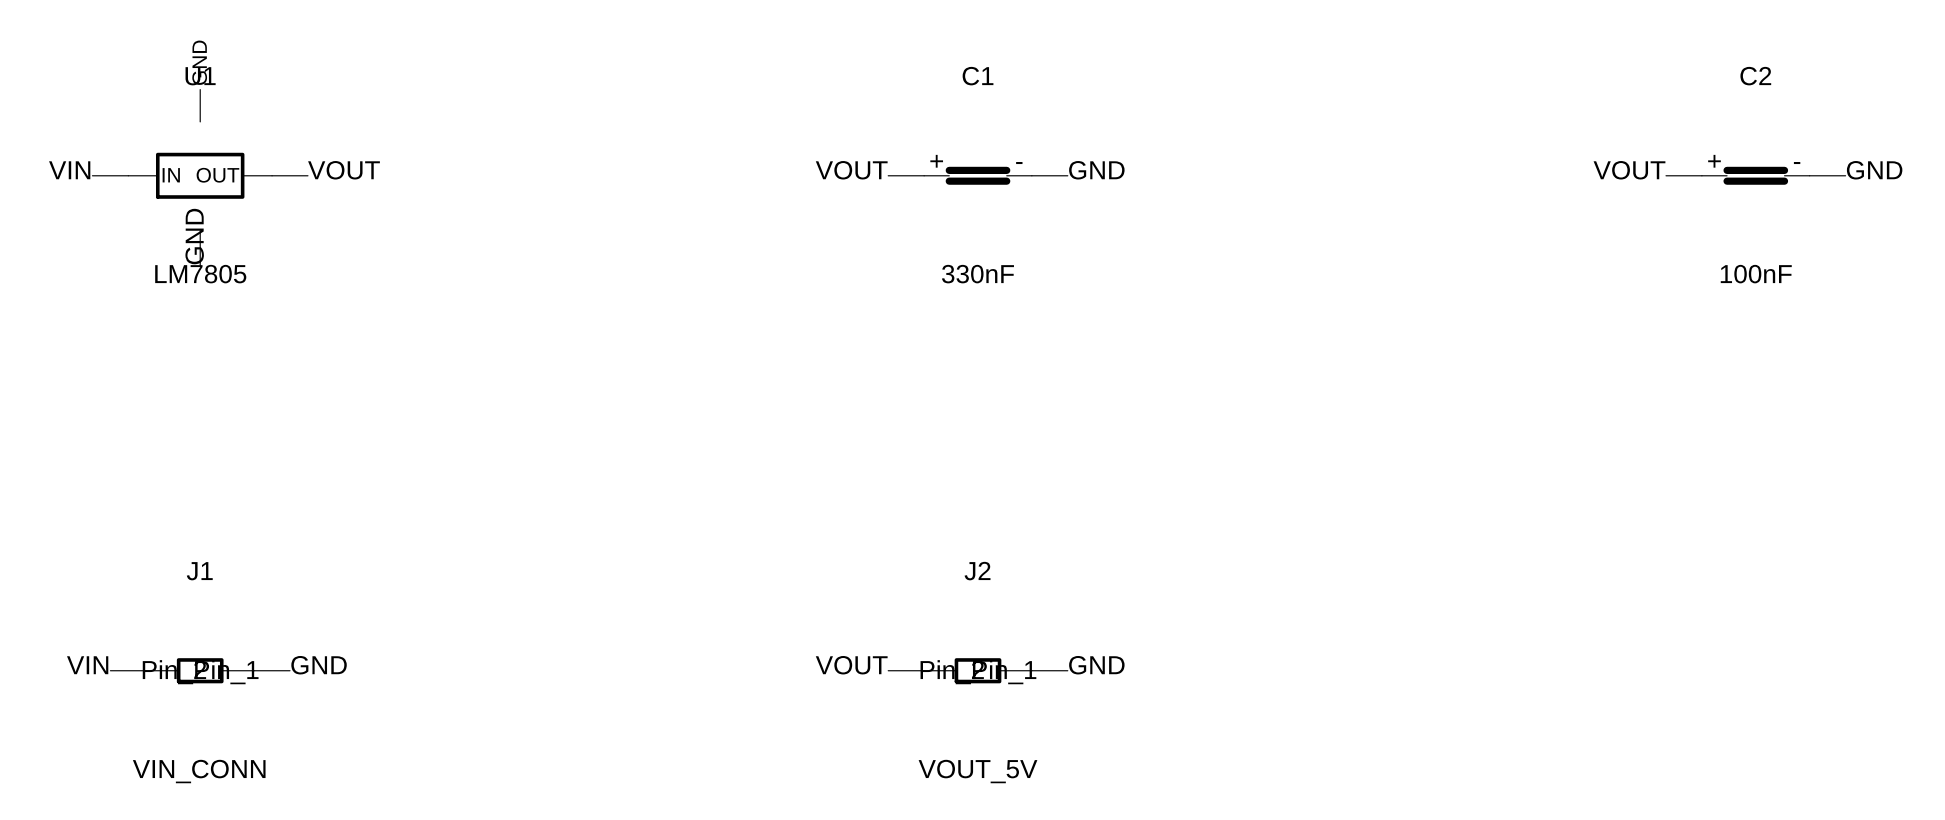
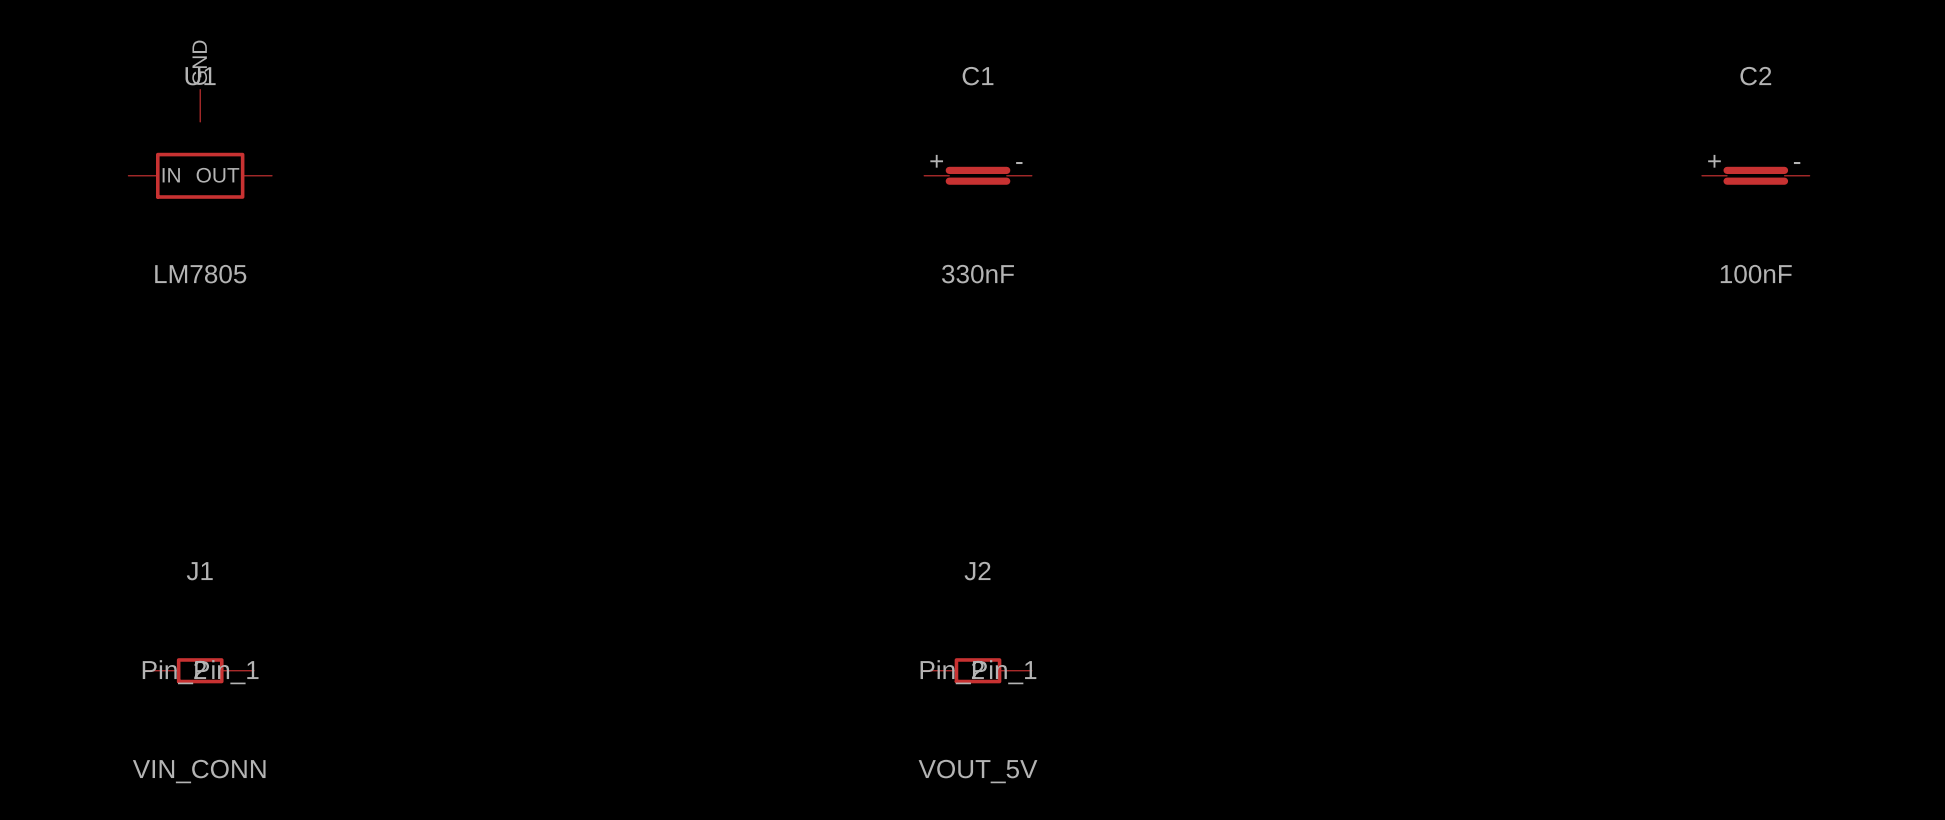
label: VIN (69, 170) -> none
label: VOUT (343, 170) -> none
label: VOUT (851, 170) -> none
label: GND (1096, 170) -> none
label: VOUT (1629, 170) -> none
label: GND (1874, 170) -> none
wire: (92, 175) (128, 175) -> none
wire: (272, 175) (307, 175) -> none
wire: (888, 175) (924, 175) -> none
wire: (1031, 175) (1067, 175) -> none
wire: (1665, 175) (1701, 175) -> none
wire: (1809, 175) (1845, 175) -> none
wire: (200, 229) (200, 265) -> none
label: GND (194, 236) -> none
label: VIN (87, 665) -> none
label: GND (319, 665) -> none
label: VOUT (851, 665) -> none
label: GND (1096, 665) -> none
wire: (110, 670) (146, 670) -> none
wire: (254, 670) (290, 670) -> none
wire: (888, 670) (924, 670) -> none
wire: (1031, 670) (1067, 670) -> none

